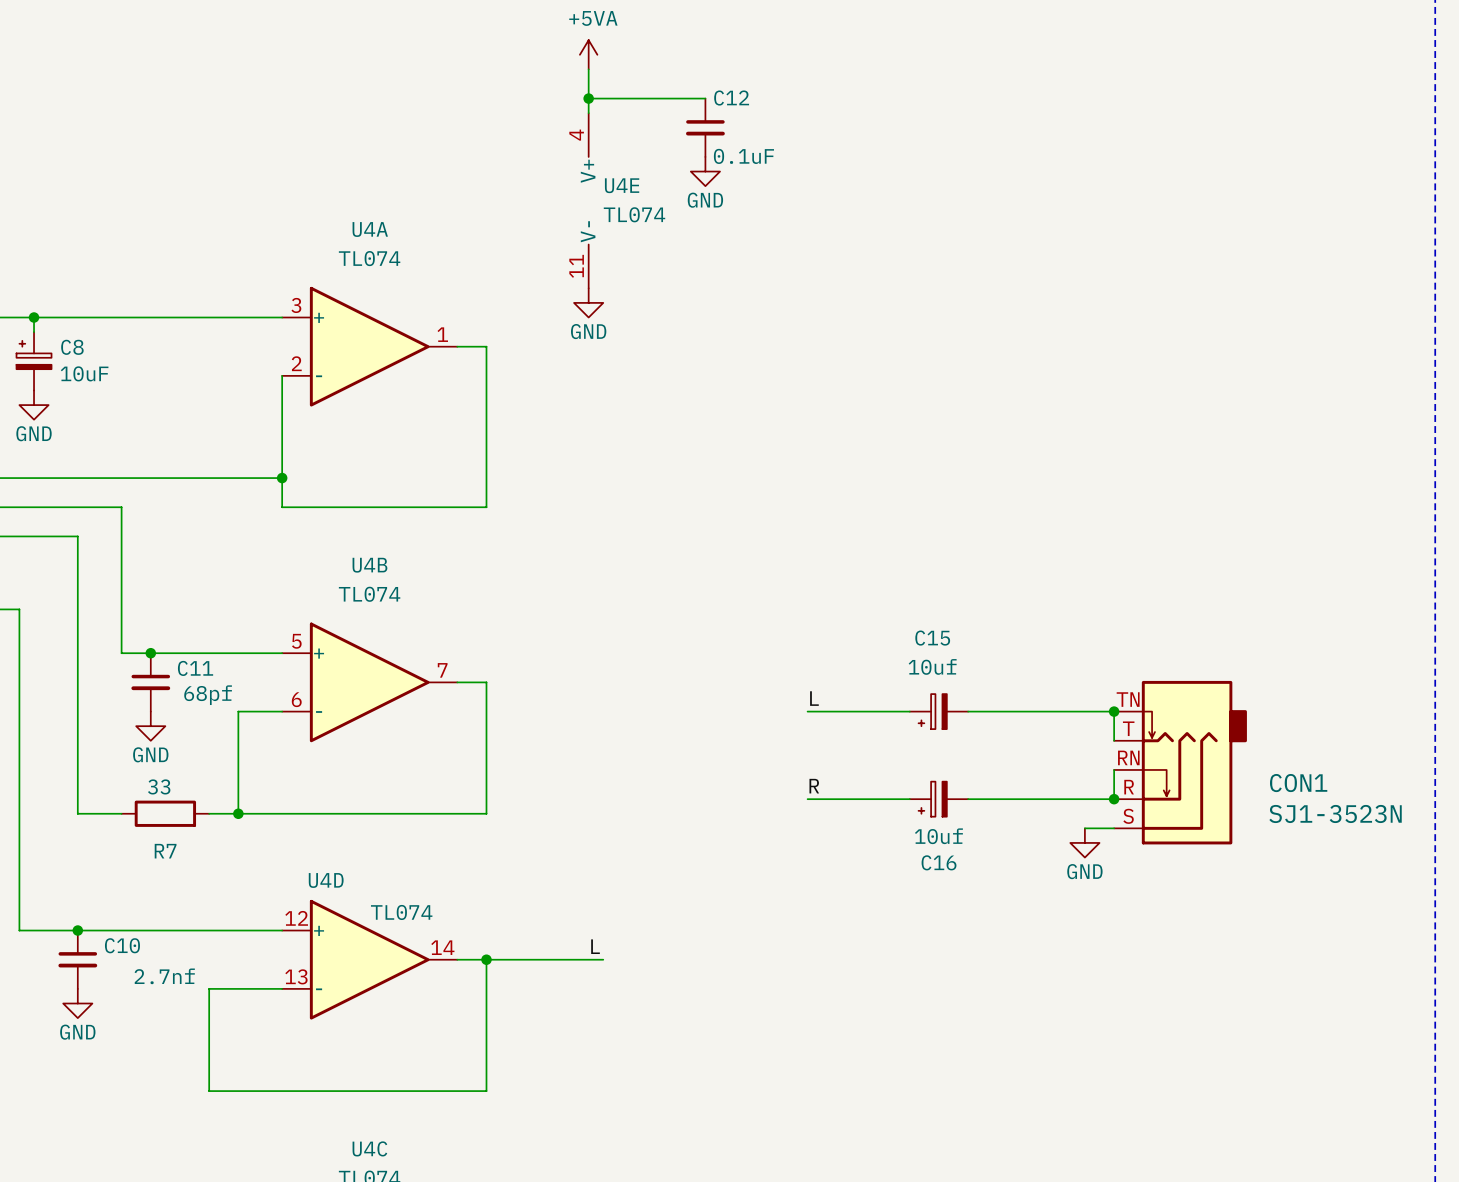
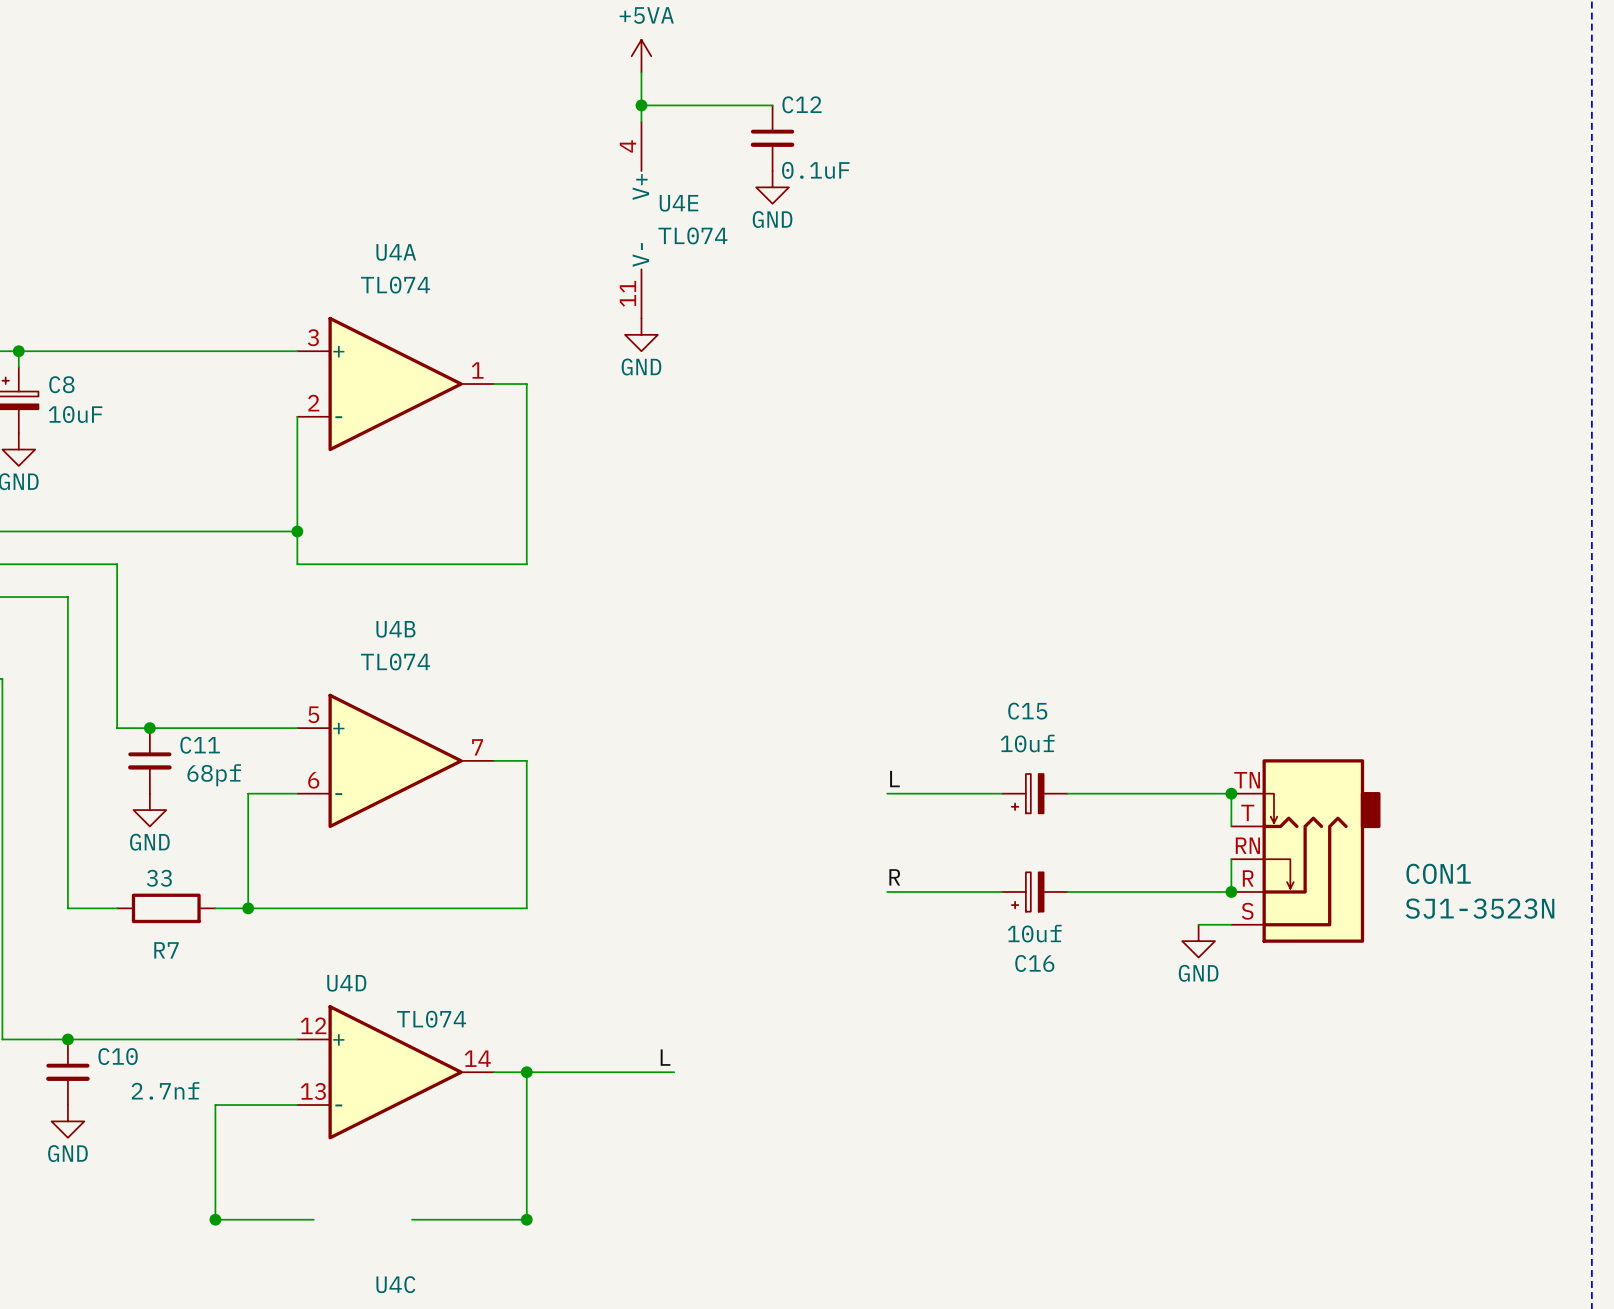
label position: L (595, 946) -> L (665, 1057)
wire: none -> (657, 1072) (674, 1072)
junction: none -> (215, 1219)
wire: (296, 1091) (384, 1091) -> none
junction: none -> (526, 1219)

